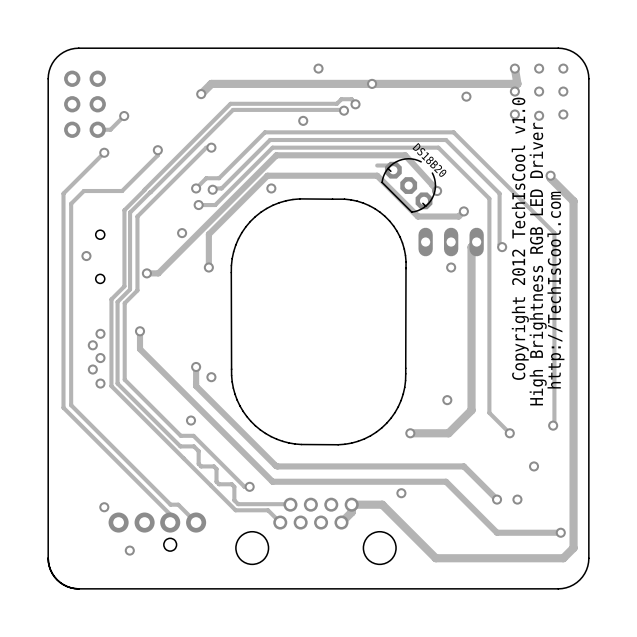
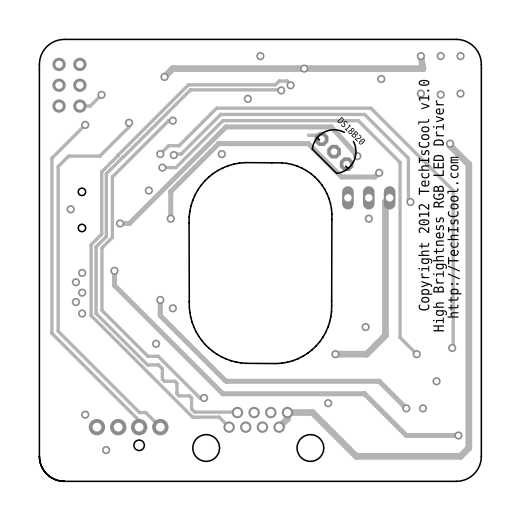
via: (514, 91) -> none
via: (539, 91) -> none
via: (563, 91) -> none

